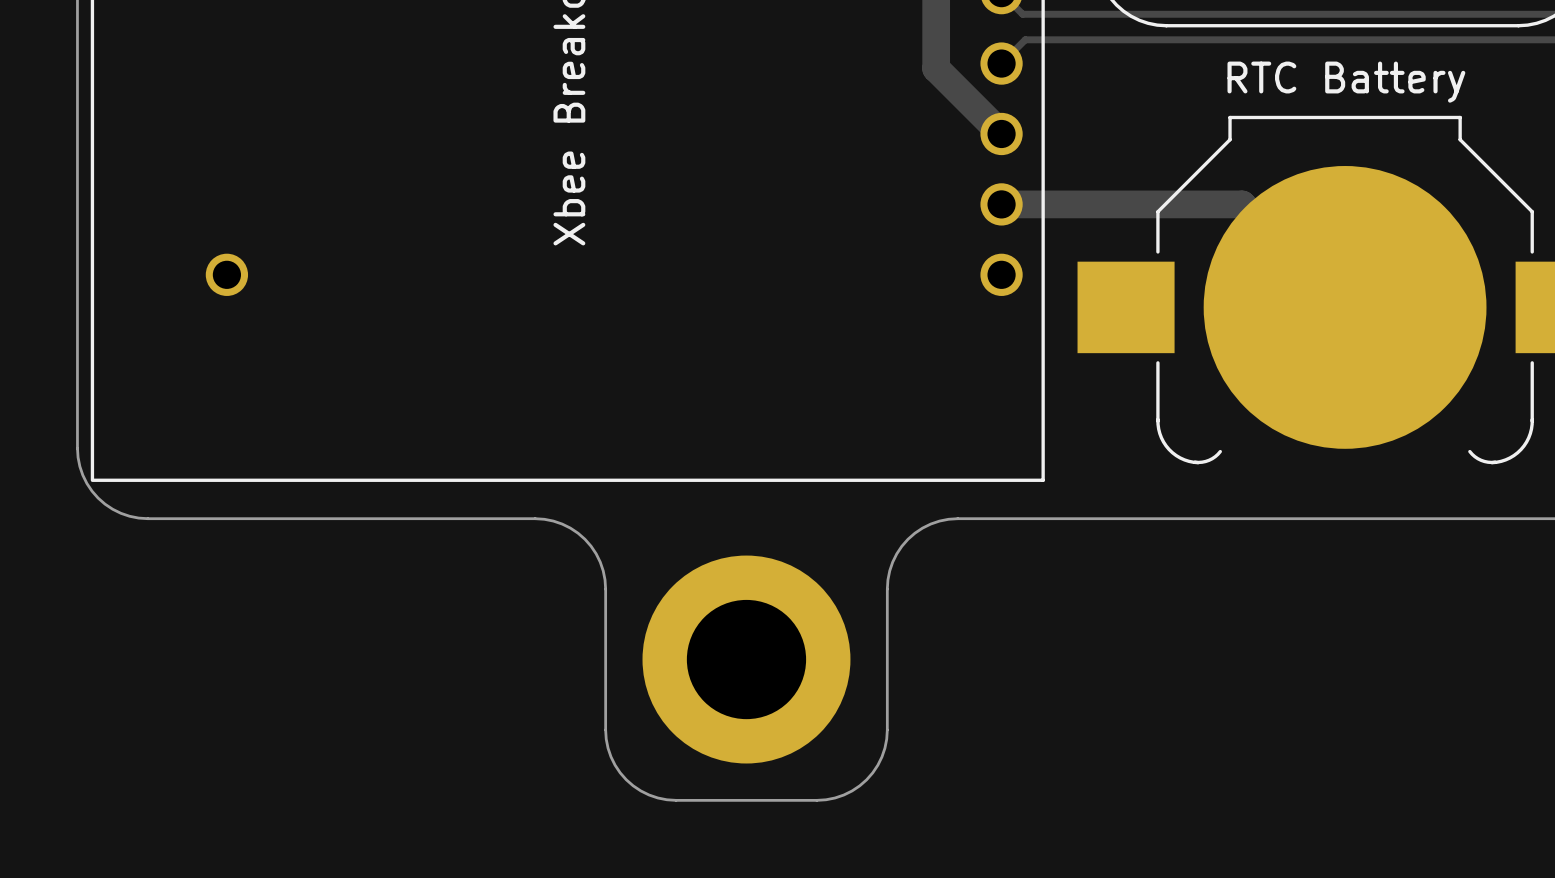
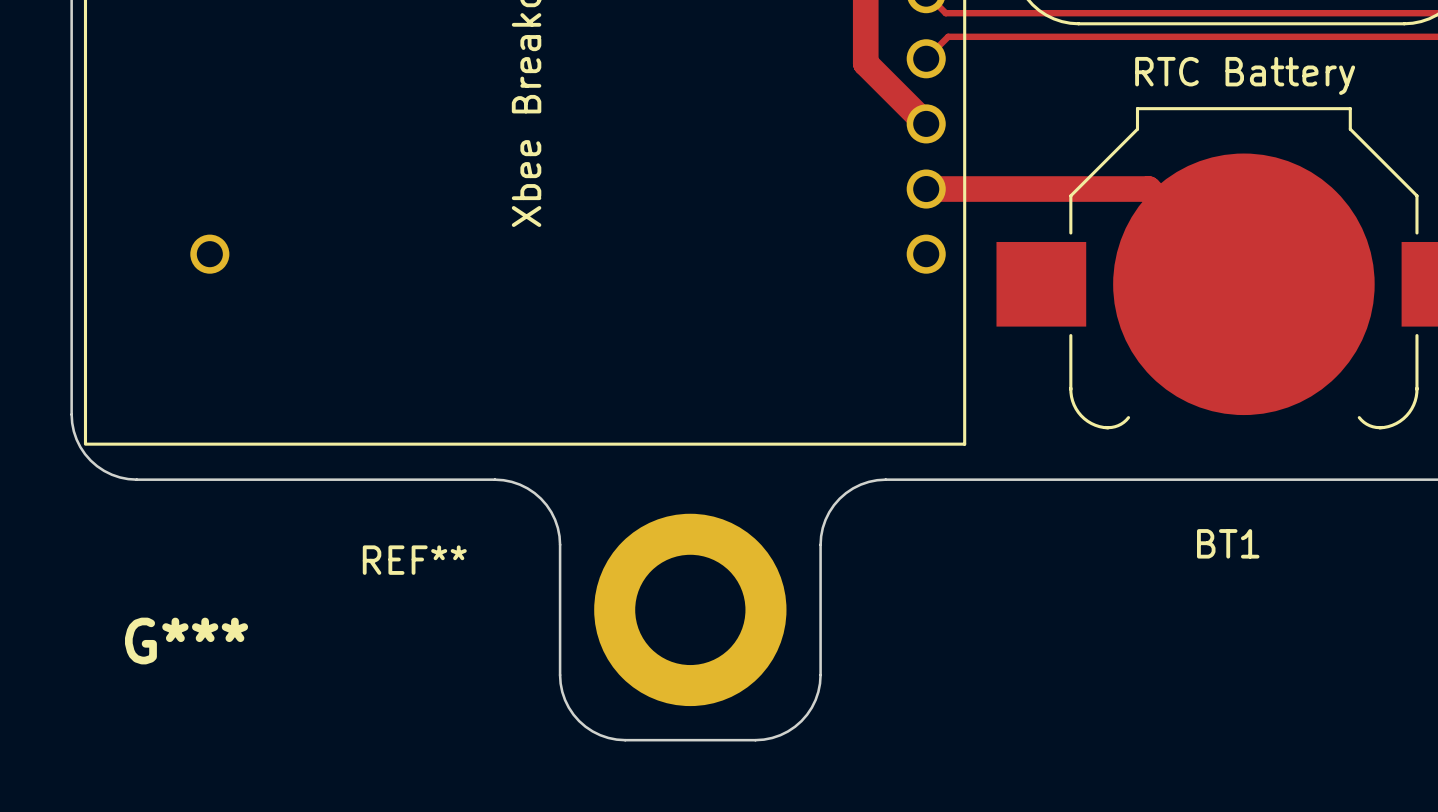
BT1 name: none -> BT1 (1228, 543)
REF** name: none -> REF** (414, 560)
G***: none -> (186, 641)

